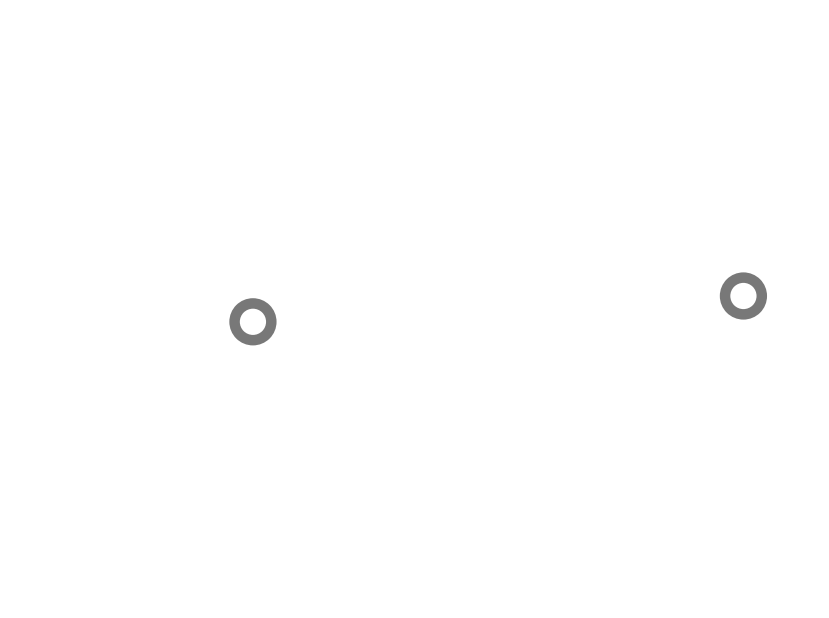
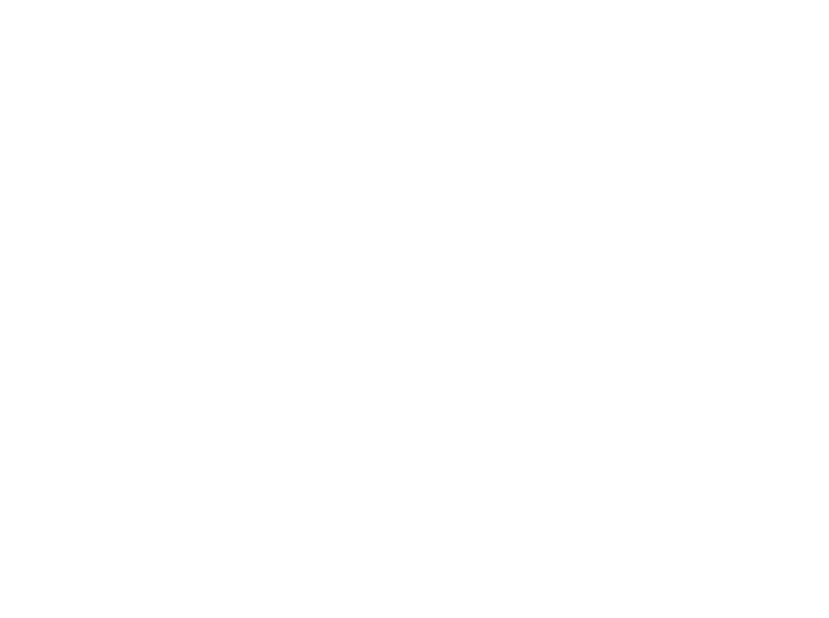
via: (743, 295) -> none
via: (252, 321) -> none

